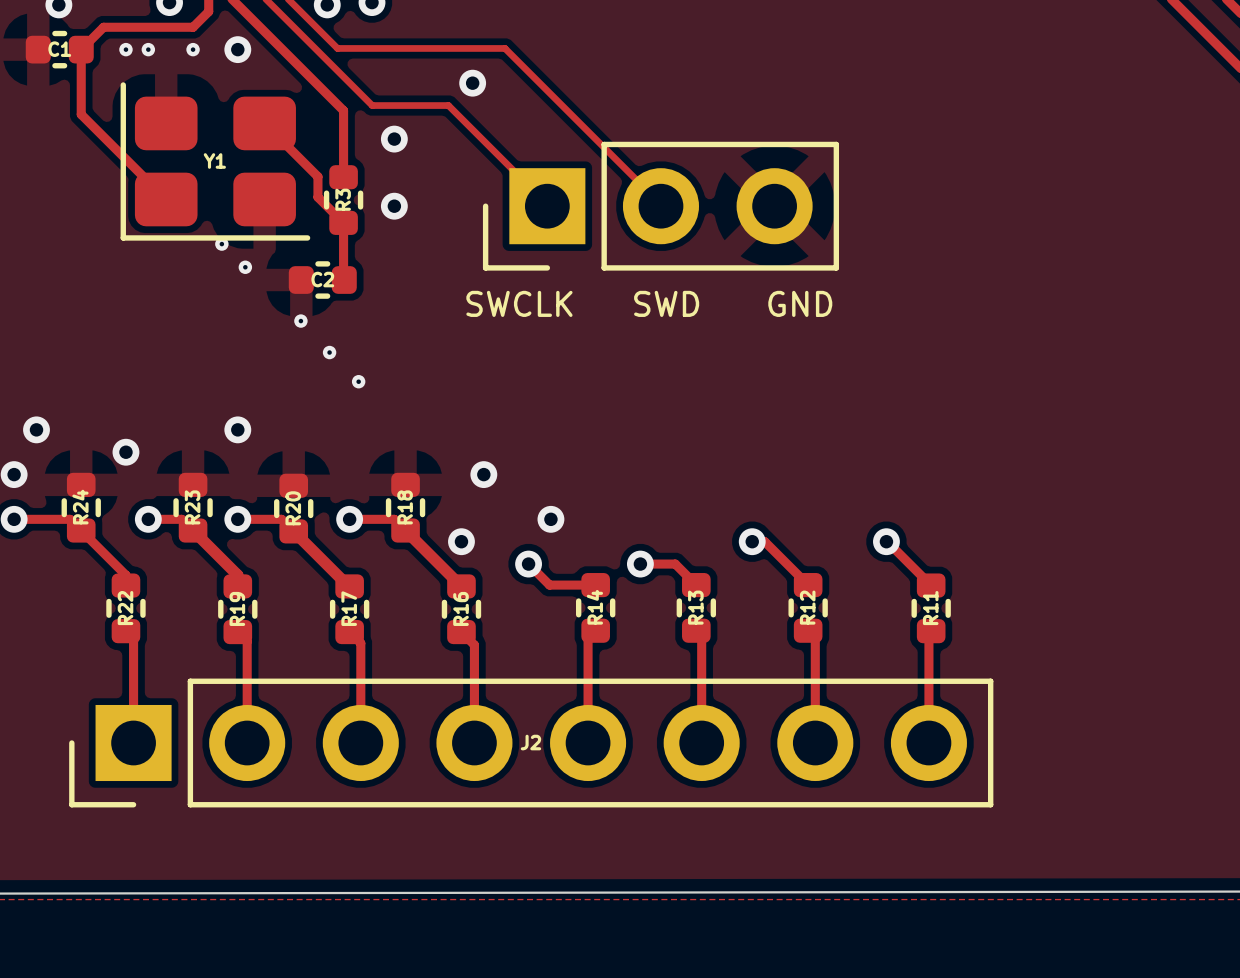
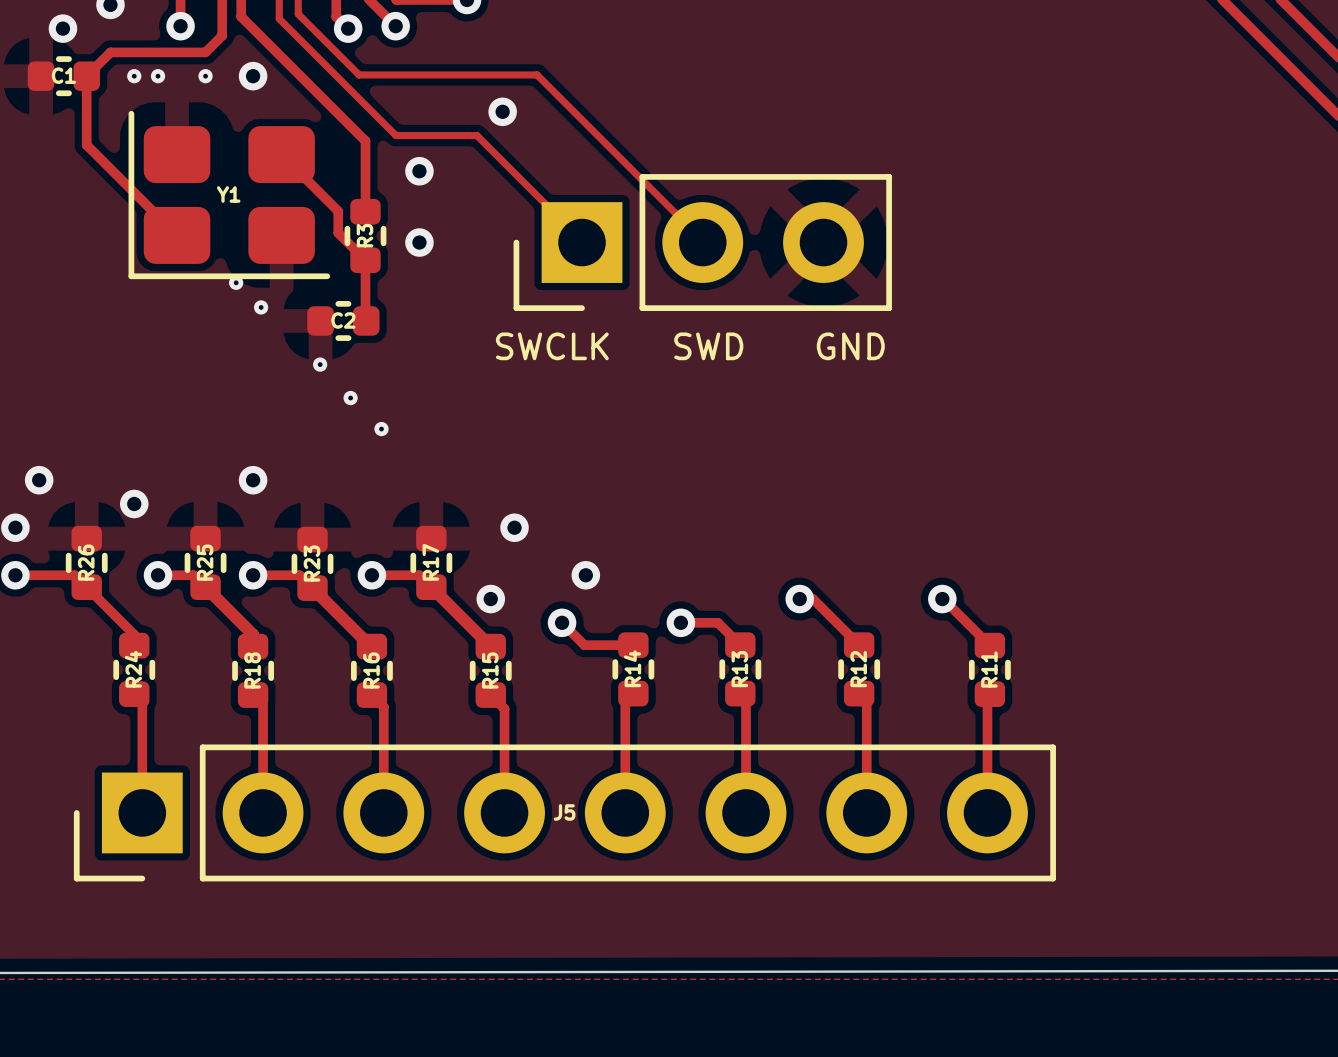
R24 name: R24 (80, 507) -> R26 (86, 562)
R23 name: R23 (192, 507) -> R25 (205, 562)
R18 name: R18 (405, 507) -> R17 (430, 562)
R20 name: R20 (293, 508) -> R23 (312, 563)
R22 name: R22 (125, 608) -> R24 (133, 669)
R19 name: R19 (237, 608) -> R18 (252, 670)
R17 name: R17 (349, 608) -> R16 (371, 670)
R16 name: R16 (461, 608) -> R15 (490, 670)
J2 name: J2 (530, 742) -> J5 (564, 812)

